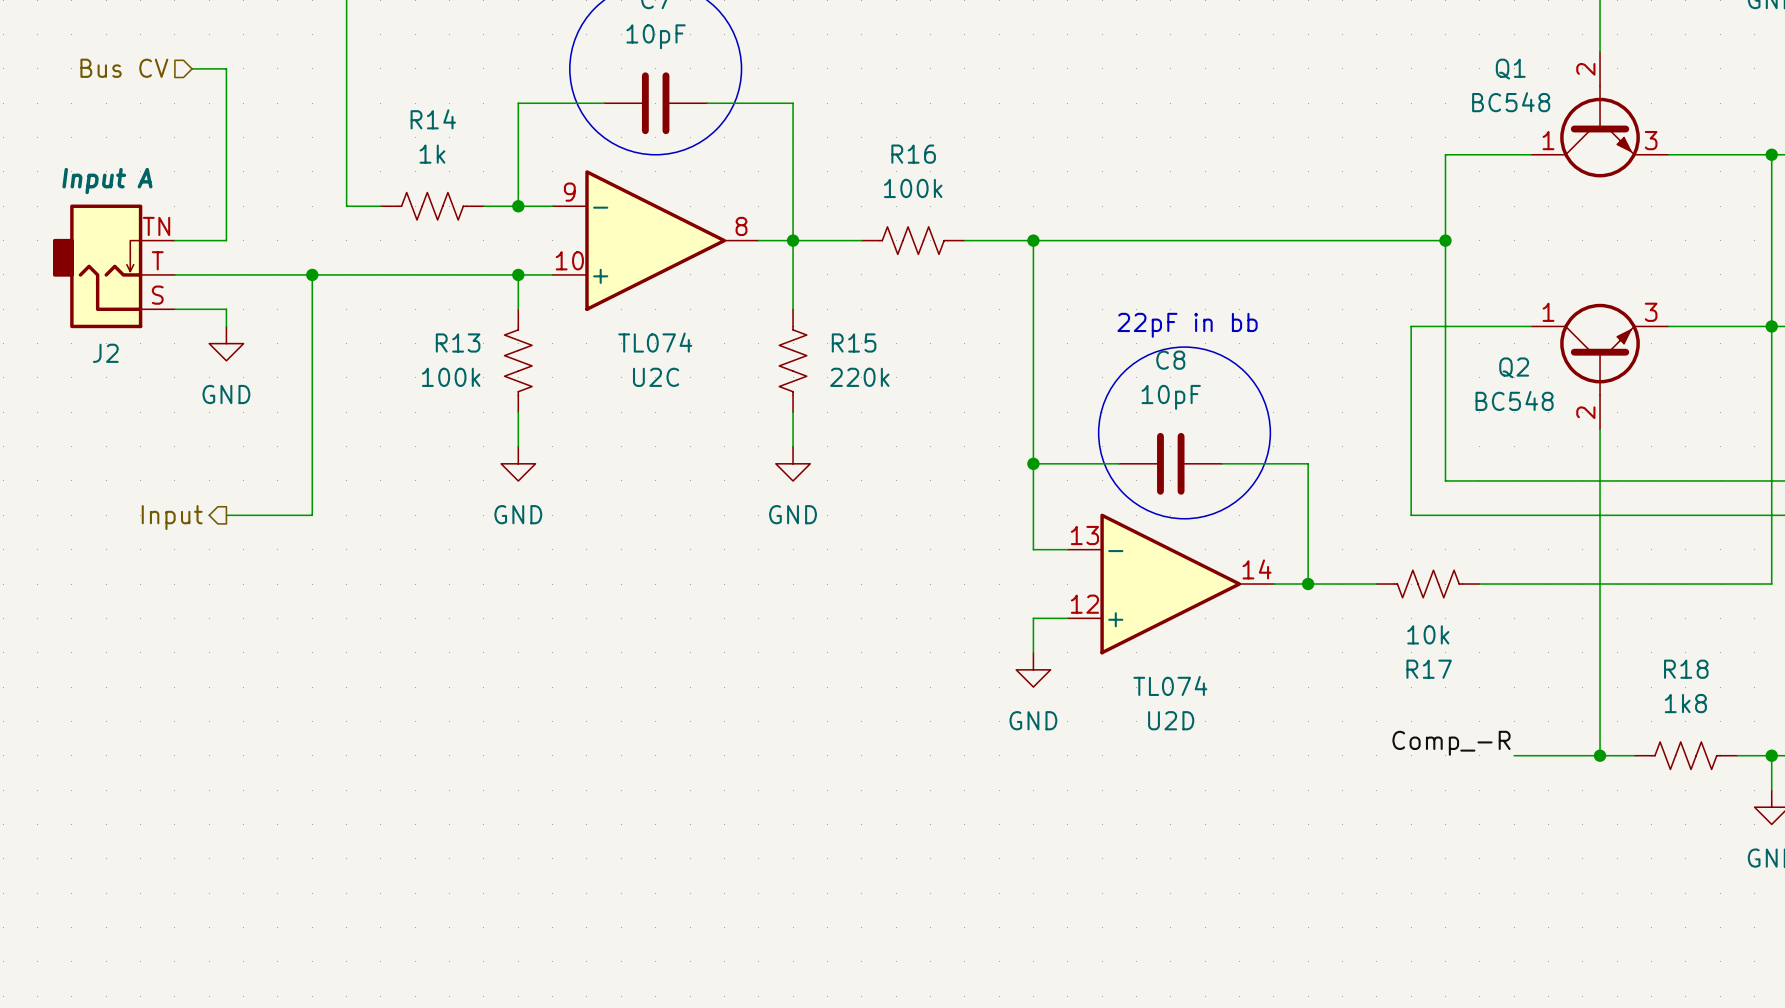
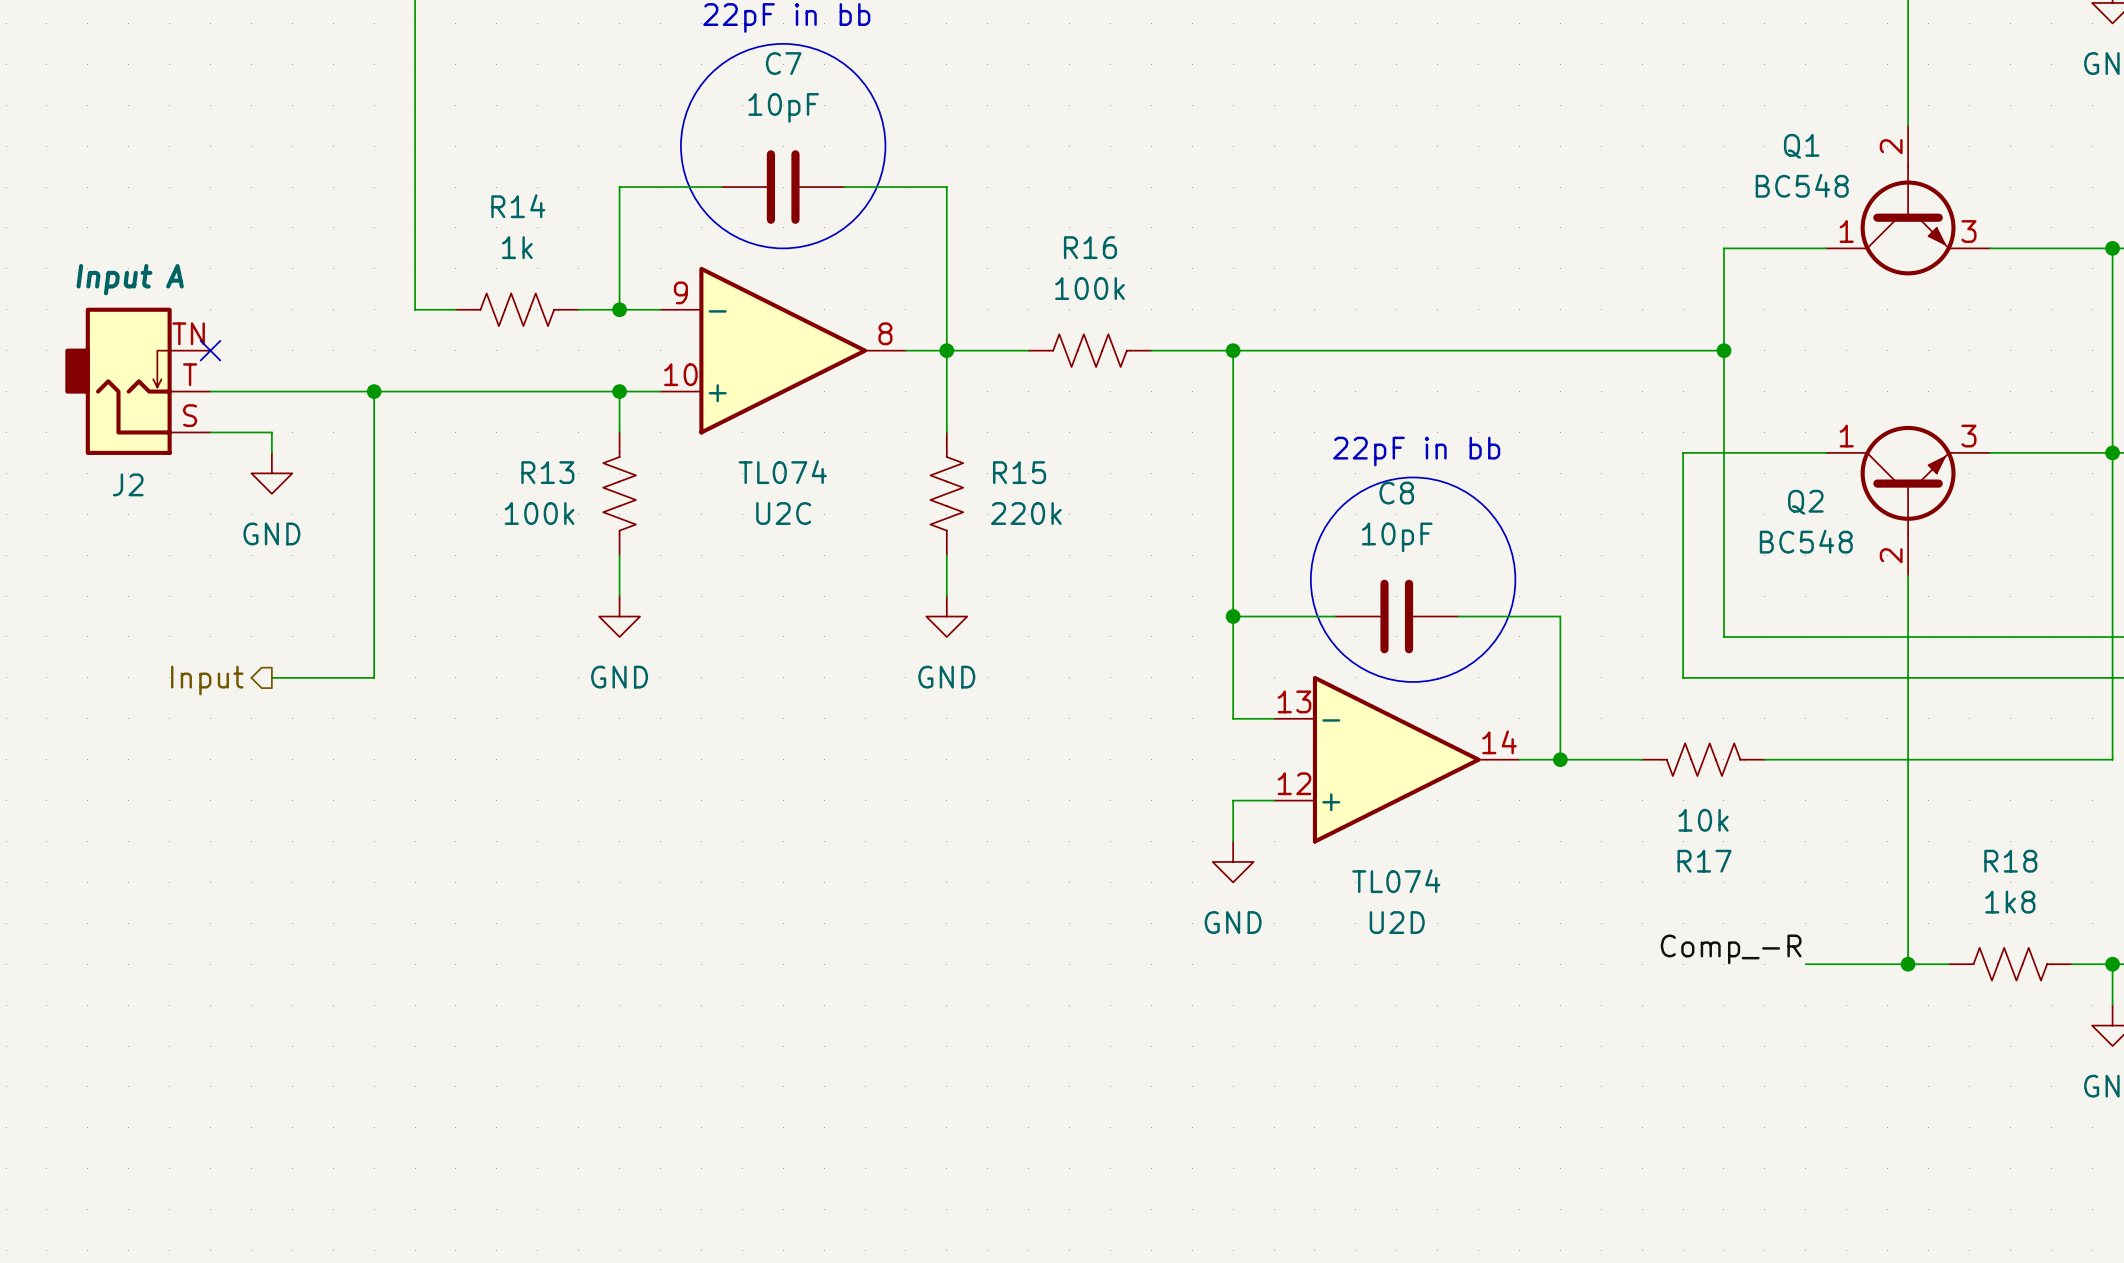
hierarchical label: Bus CV (124, 68) -> none
wire: (192, 68) (226, 68) (226, 240) (174, 240) -> none
no-connect mark: none -> (210, 350)

